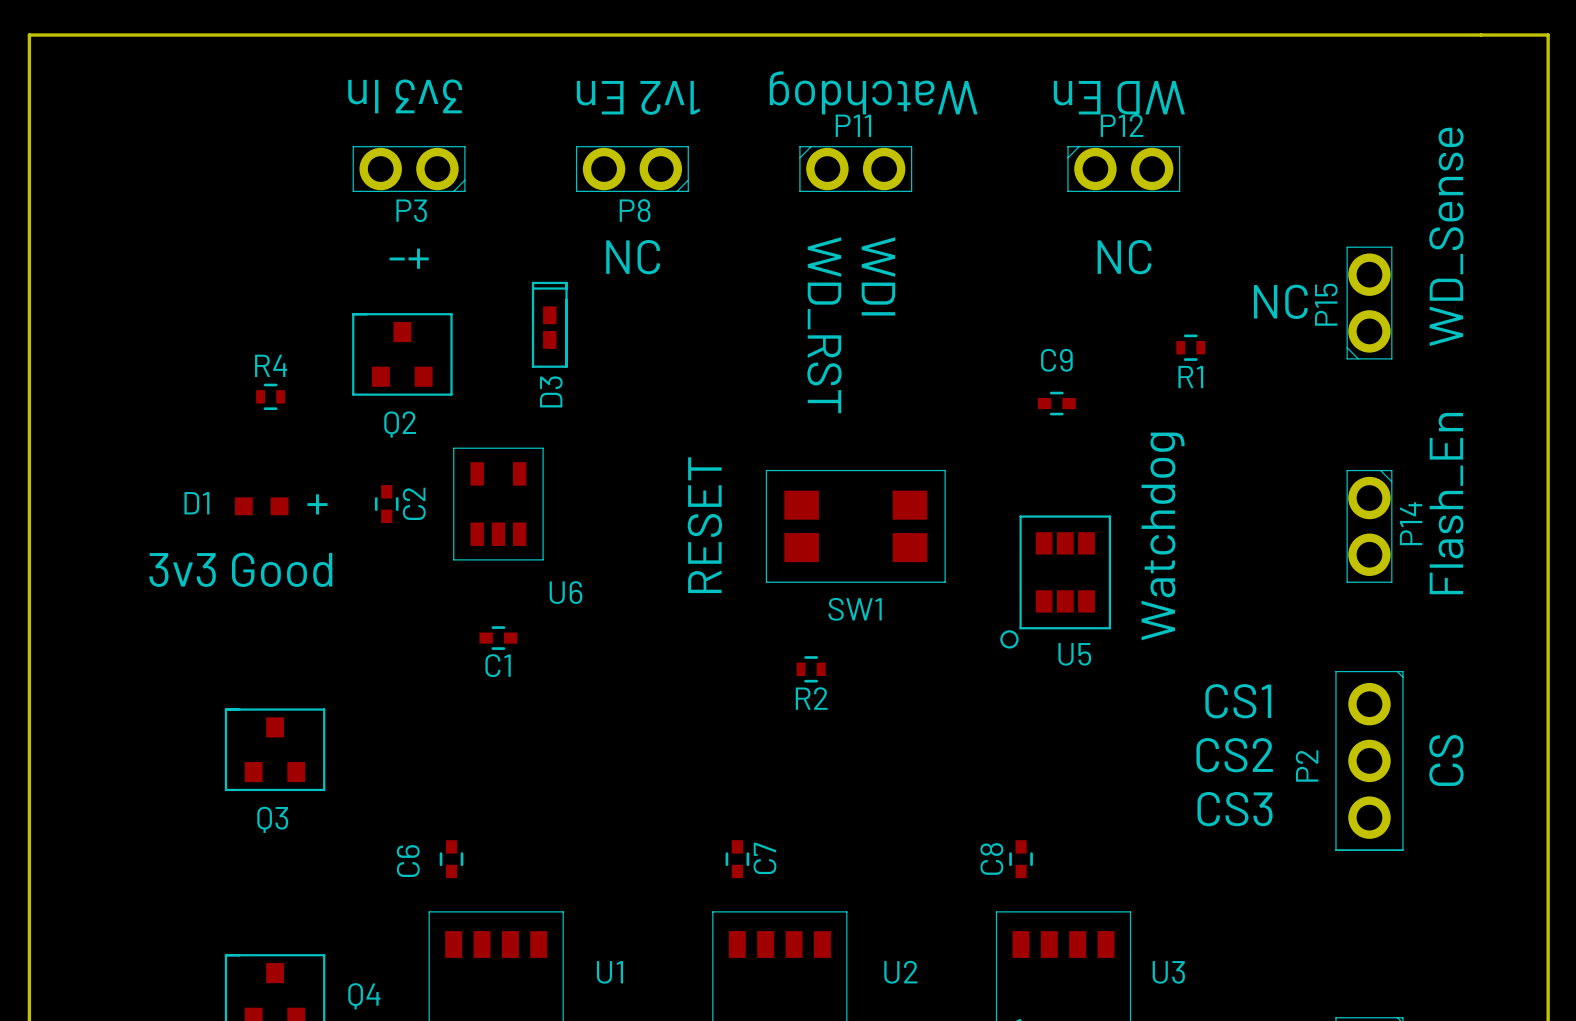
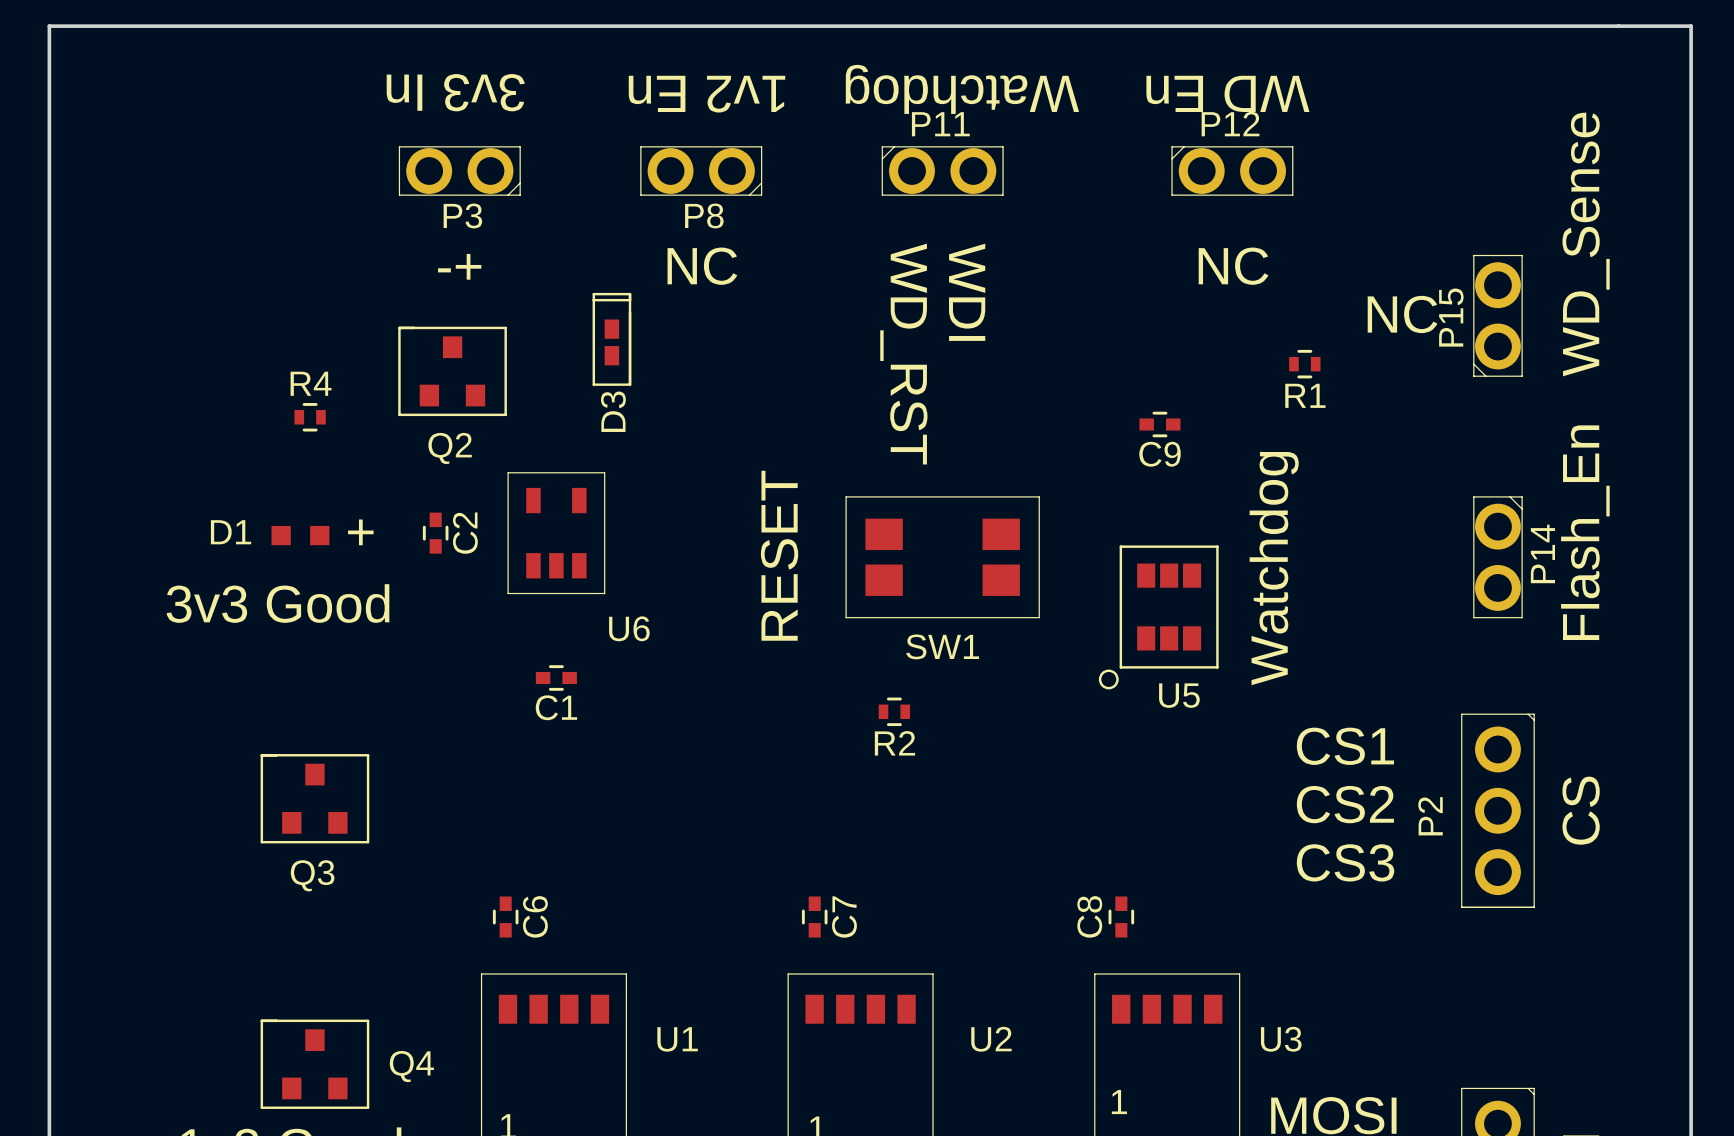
C9 name position: C9 (1056, 360) -> C9 (1160, 454)
C6 name position: C6 (408, 861) -> C6 (535, 916)

